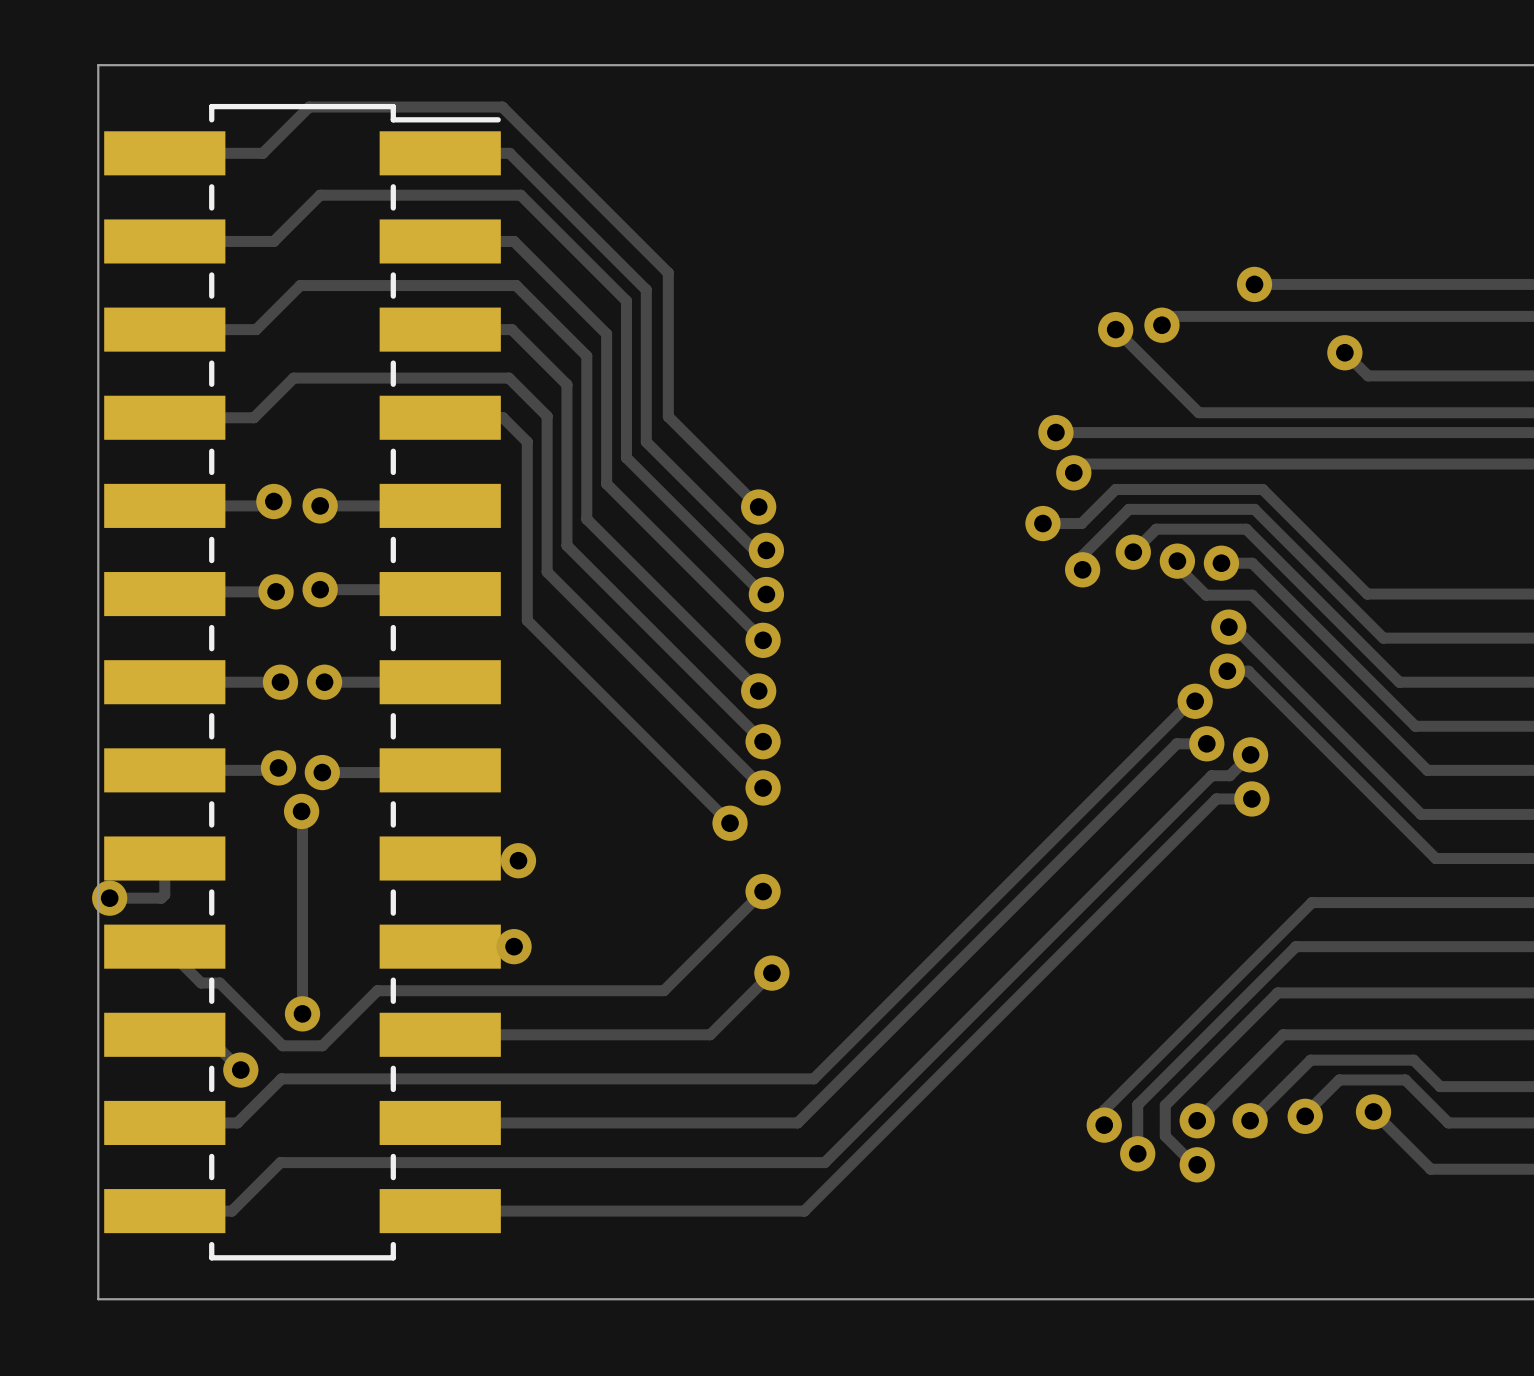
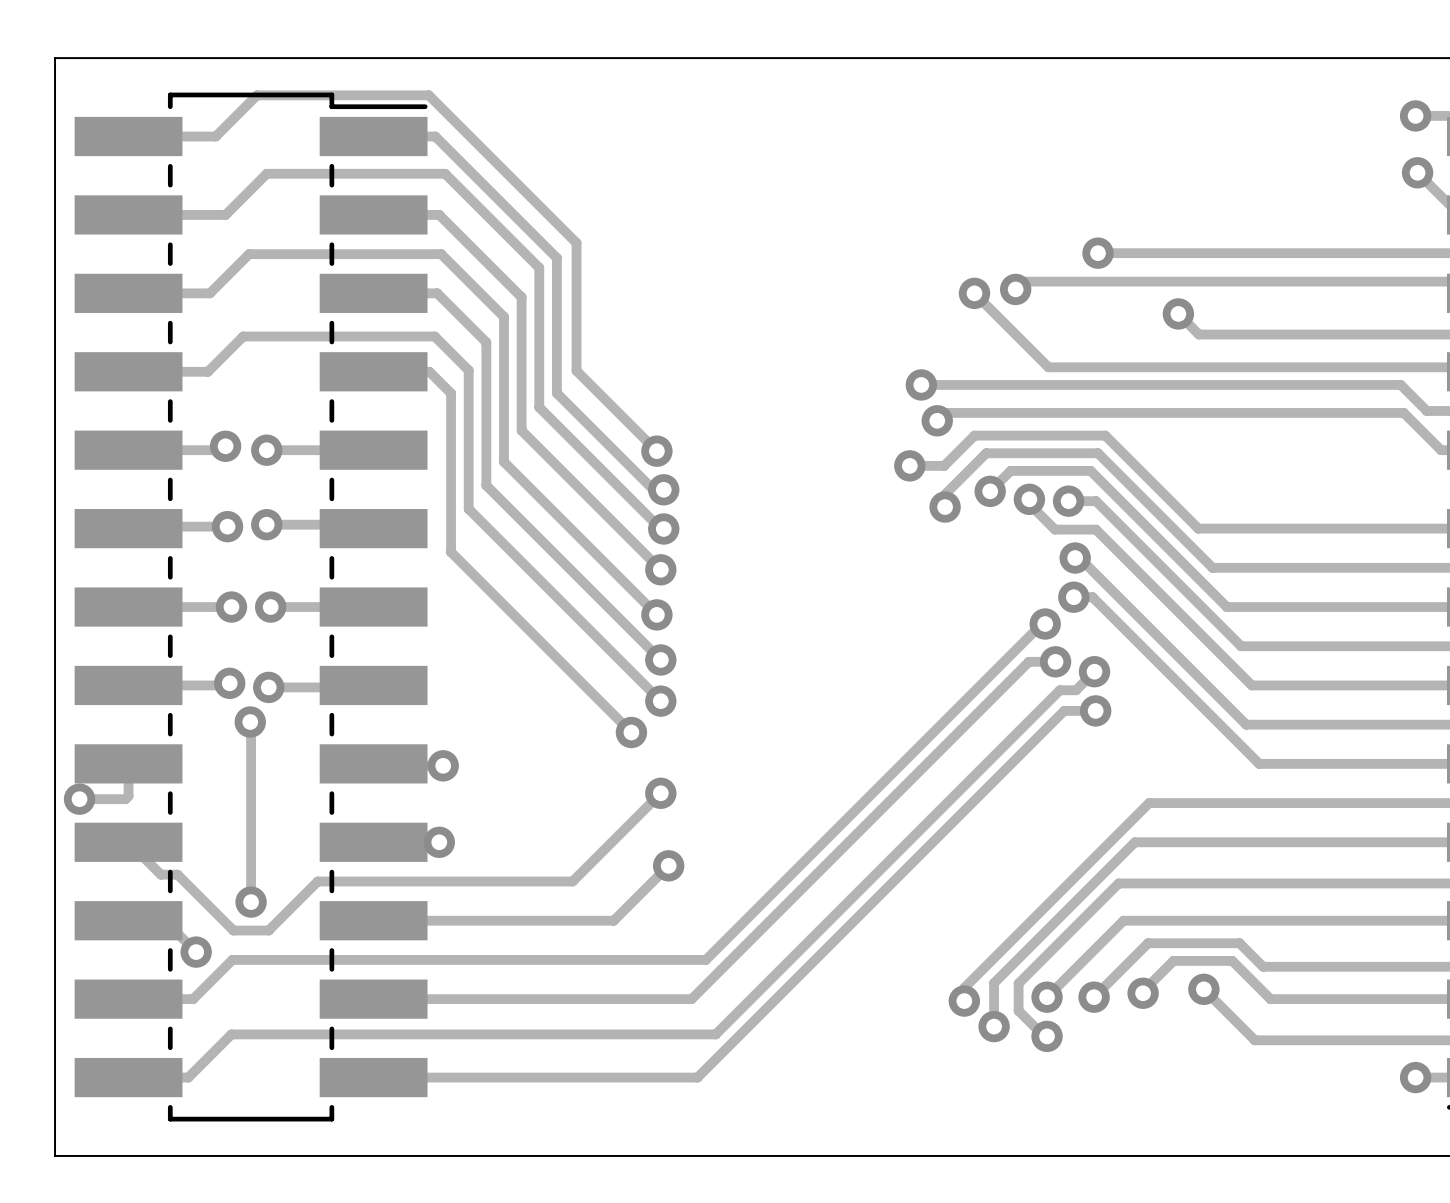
board edge: (98, 65) (98, 1299) -> (69, 58) (55, 58) (55, 1155) (69, 1155)

